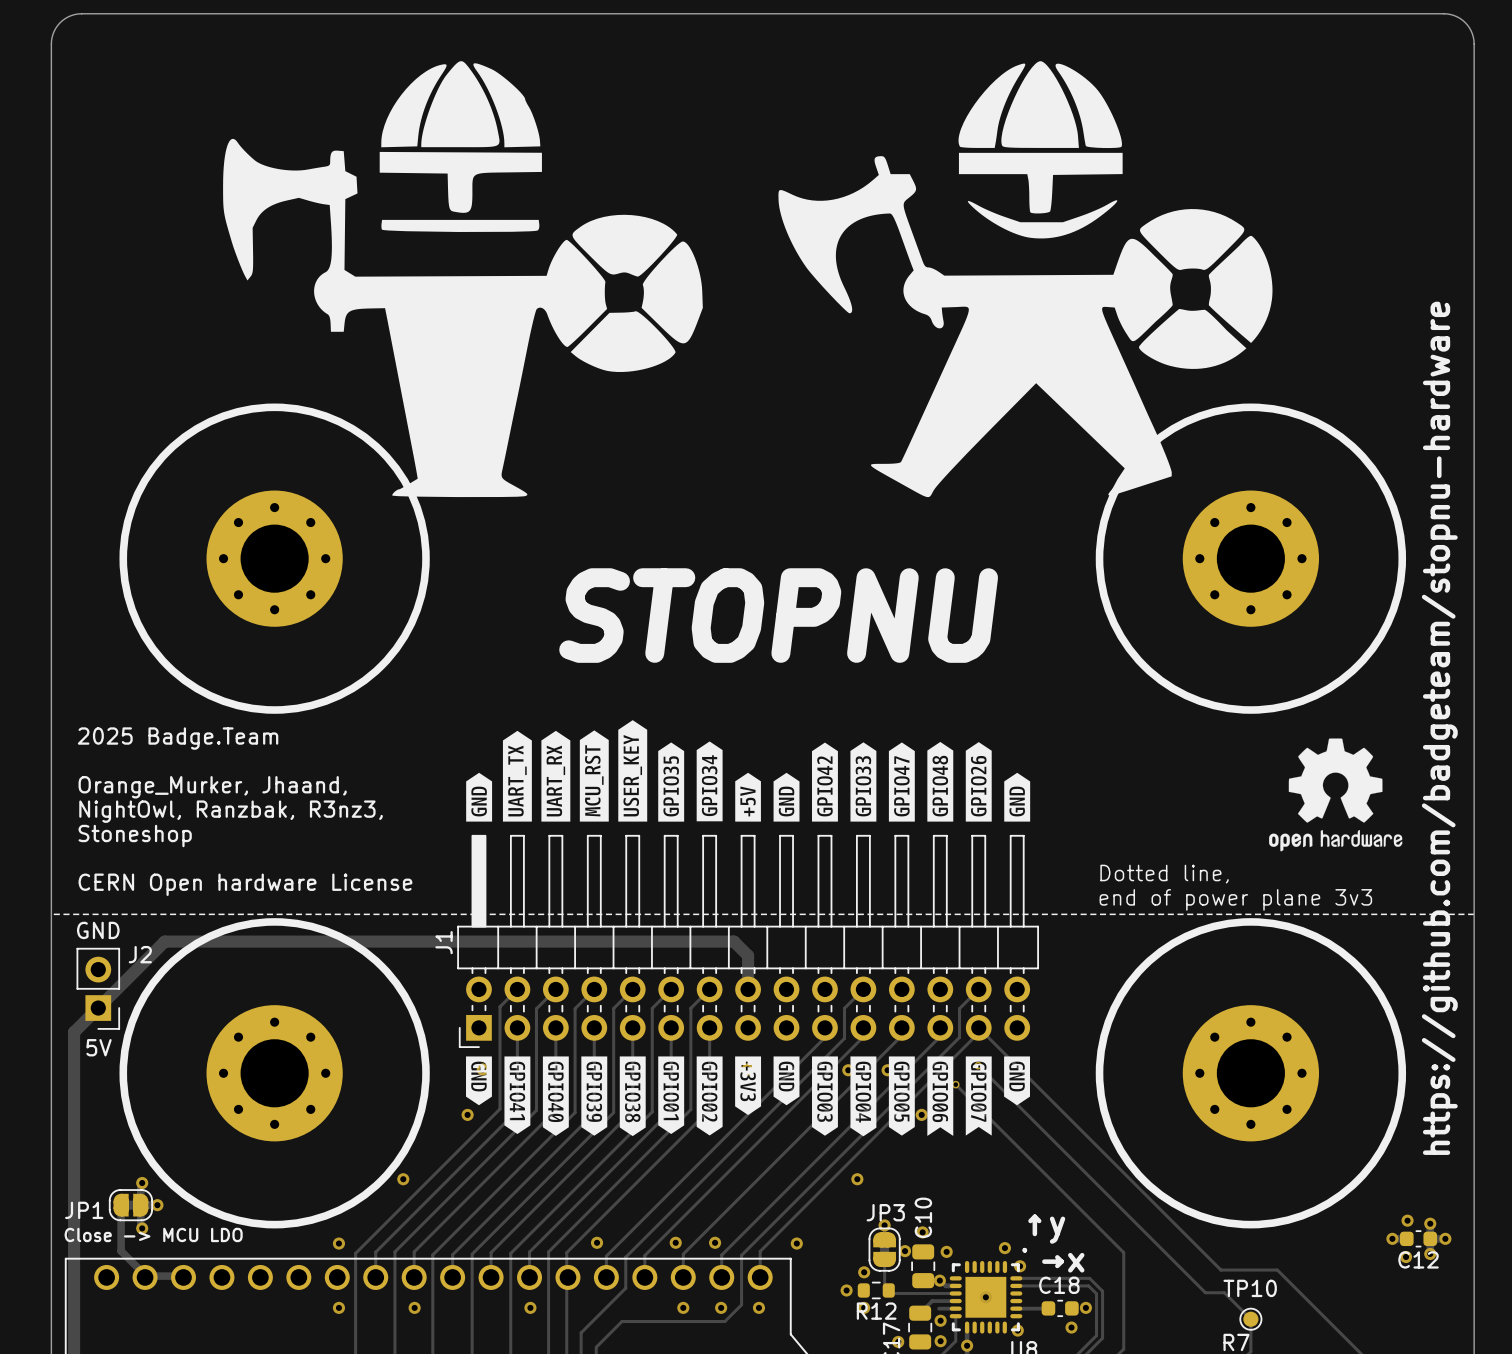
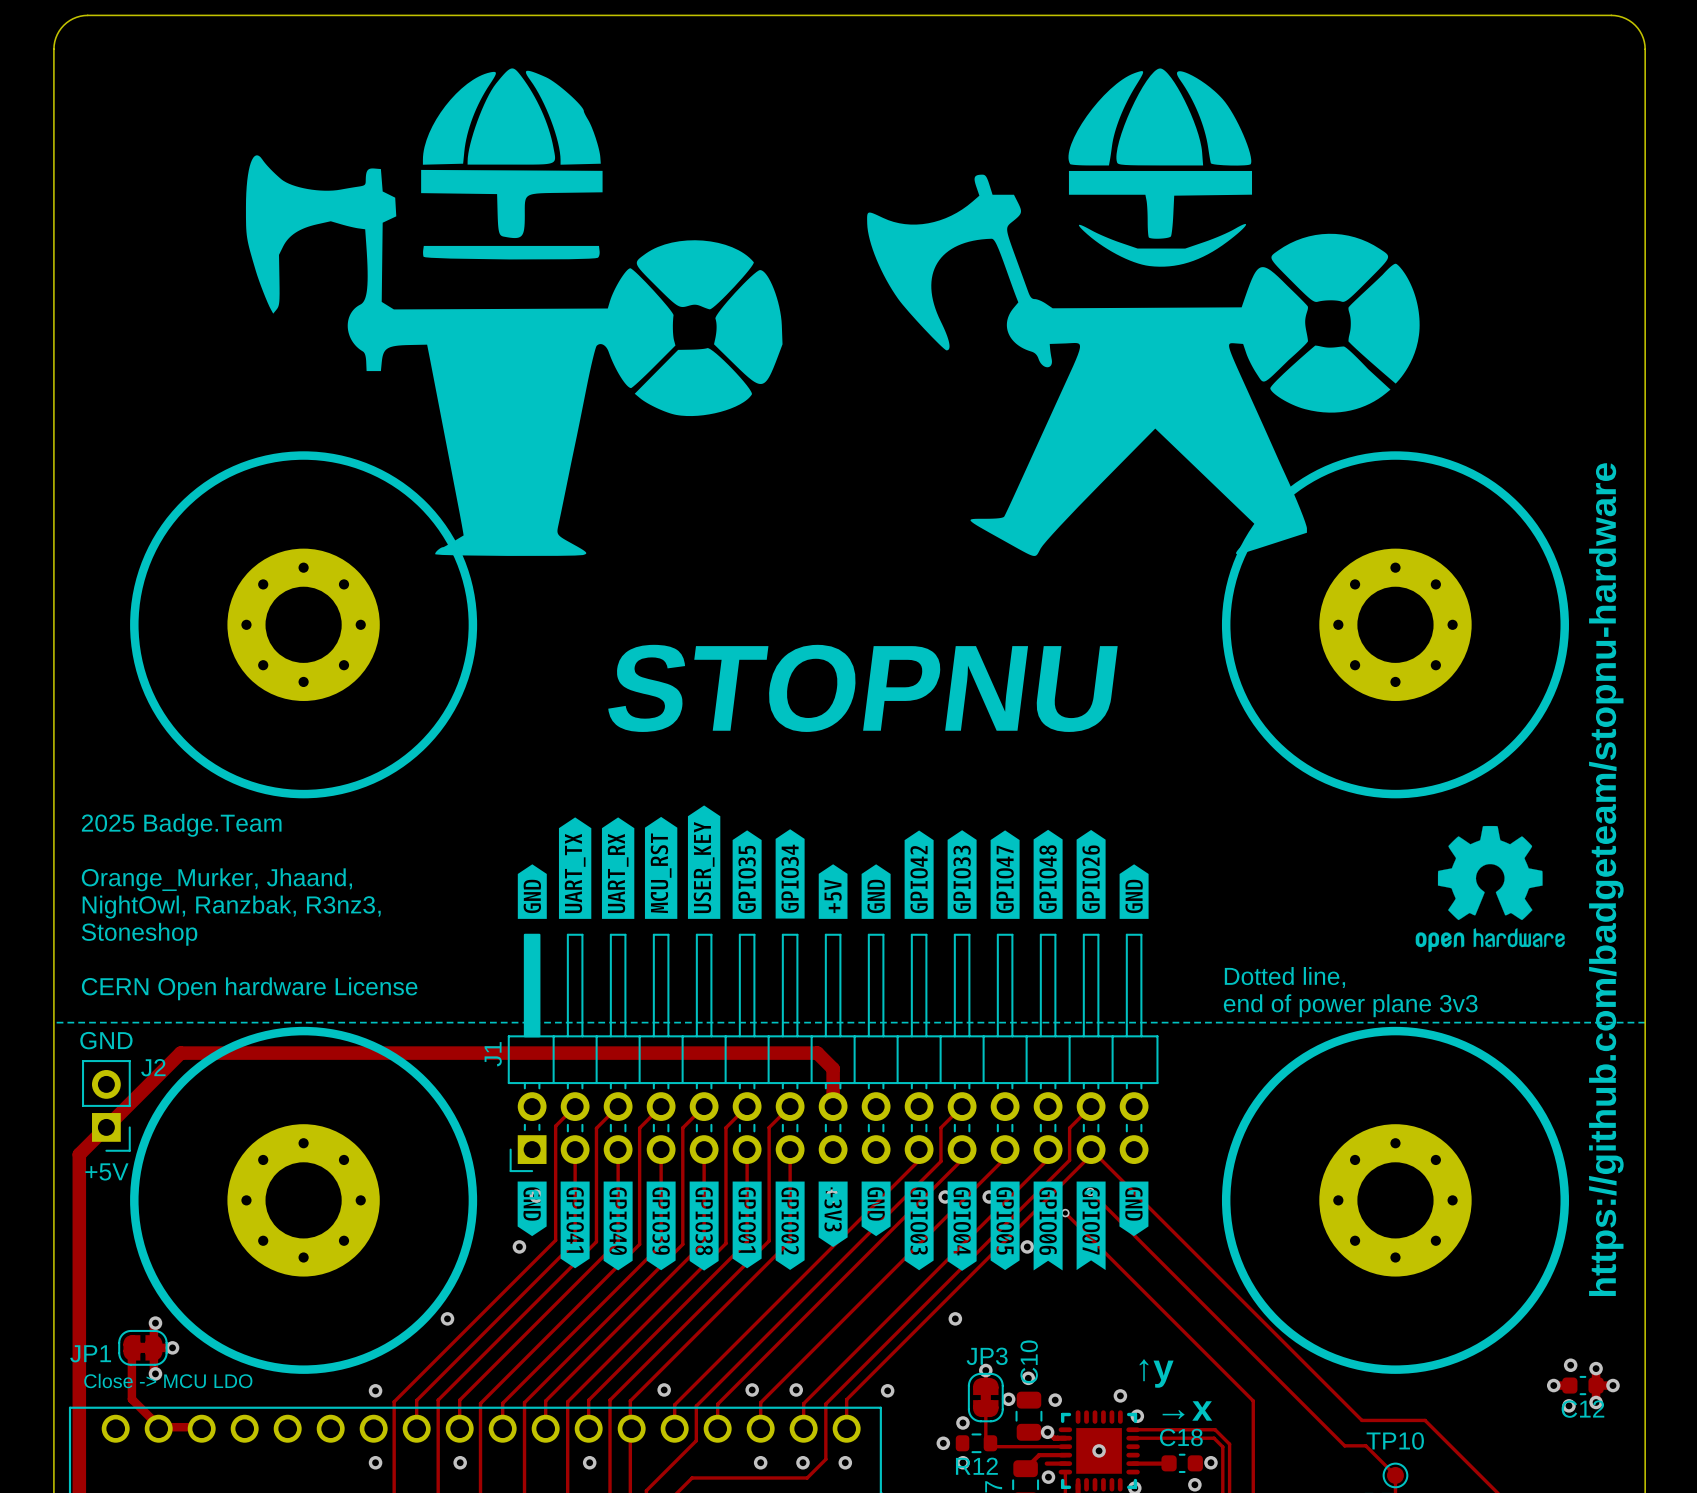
J2 text: 5V (99, 1047) -> +5V (106, 1171)
text: • (1024, 1250) -> none

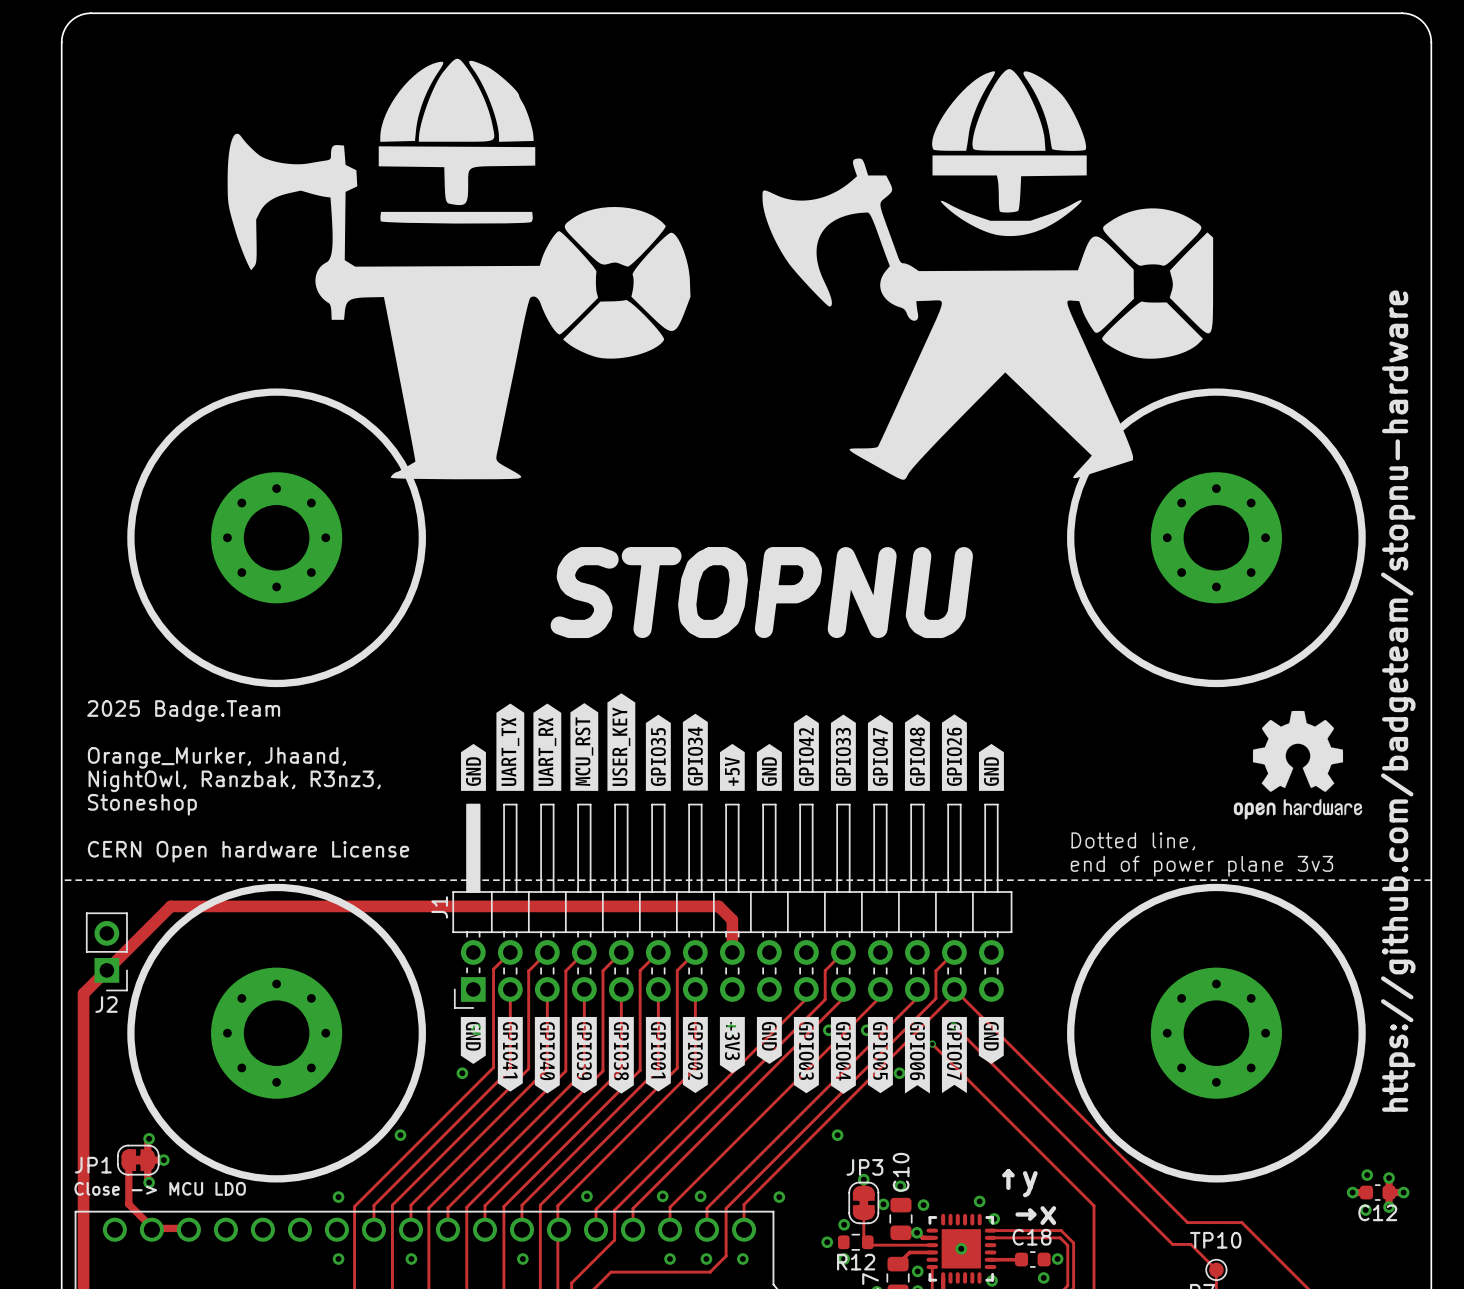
drawing shape: [245, 68, 1420, 556] -> [227, 58, 1214, 480]
J2 text: GND (106, 1040) -> none
J2 name position: J2 (153, 1067) -> J2 (106, 1004)
J2 text: +5V (106, 1171) -> none
track: (1046, 1463) (1065, 1463) -> none

